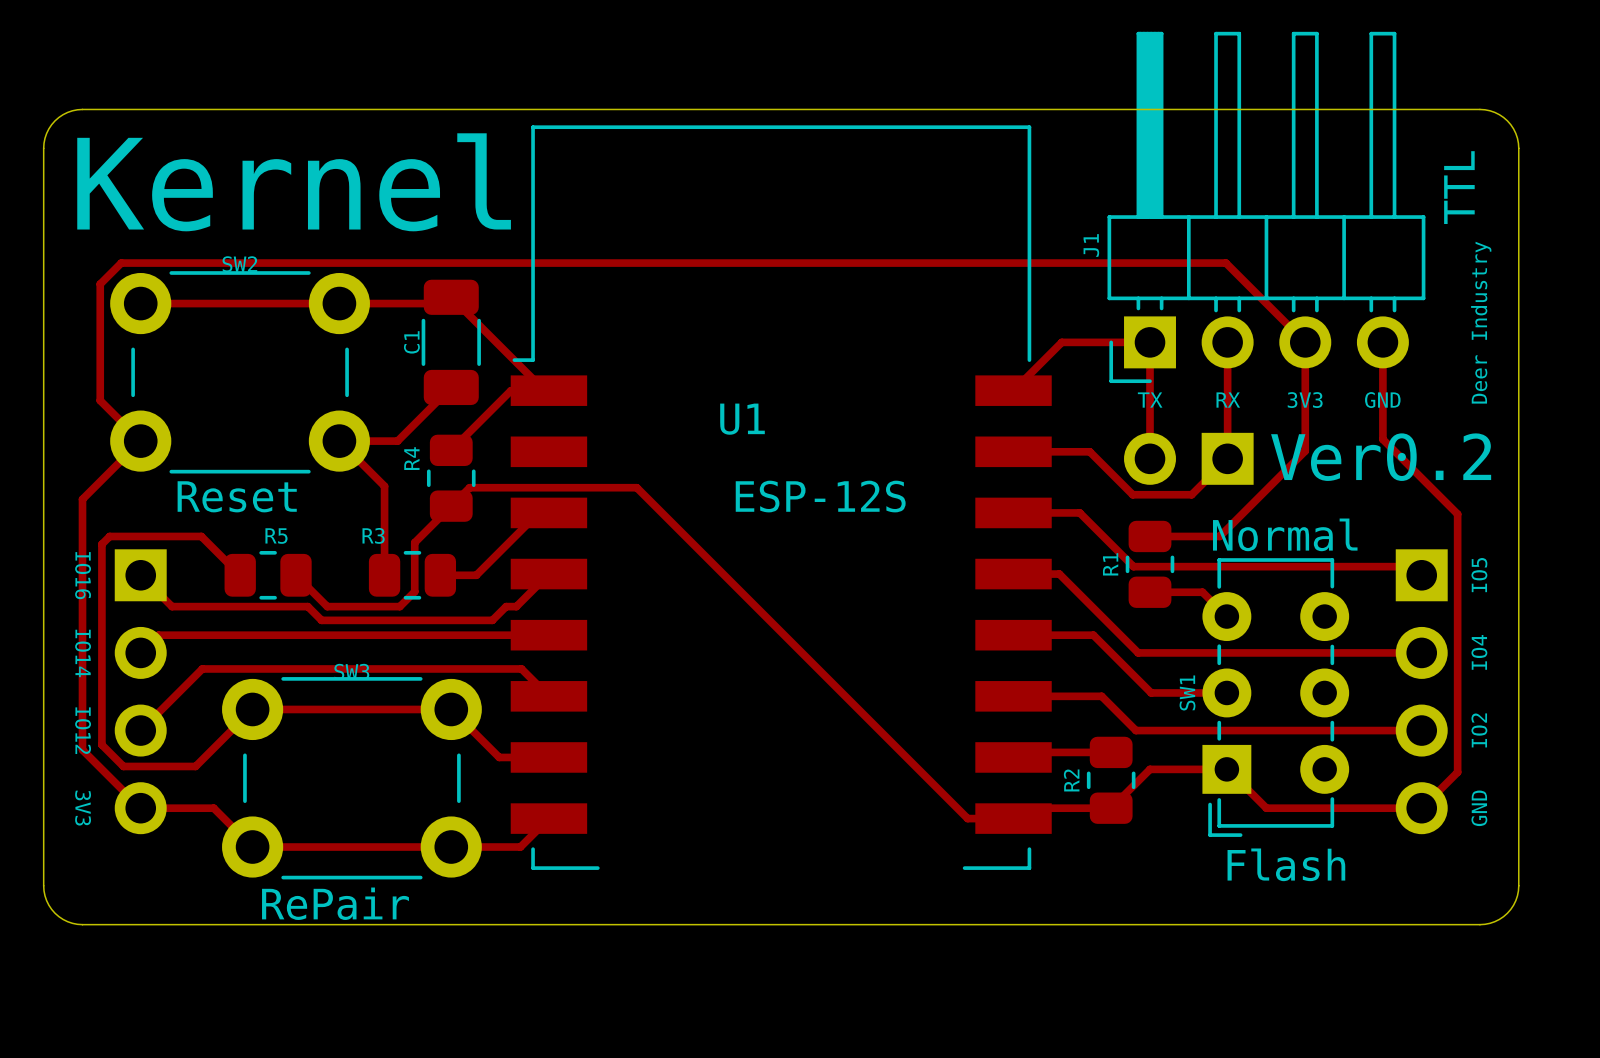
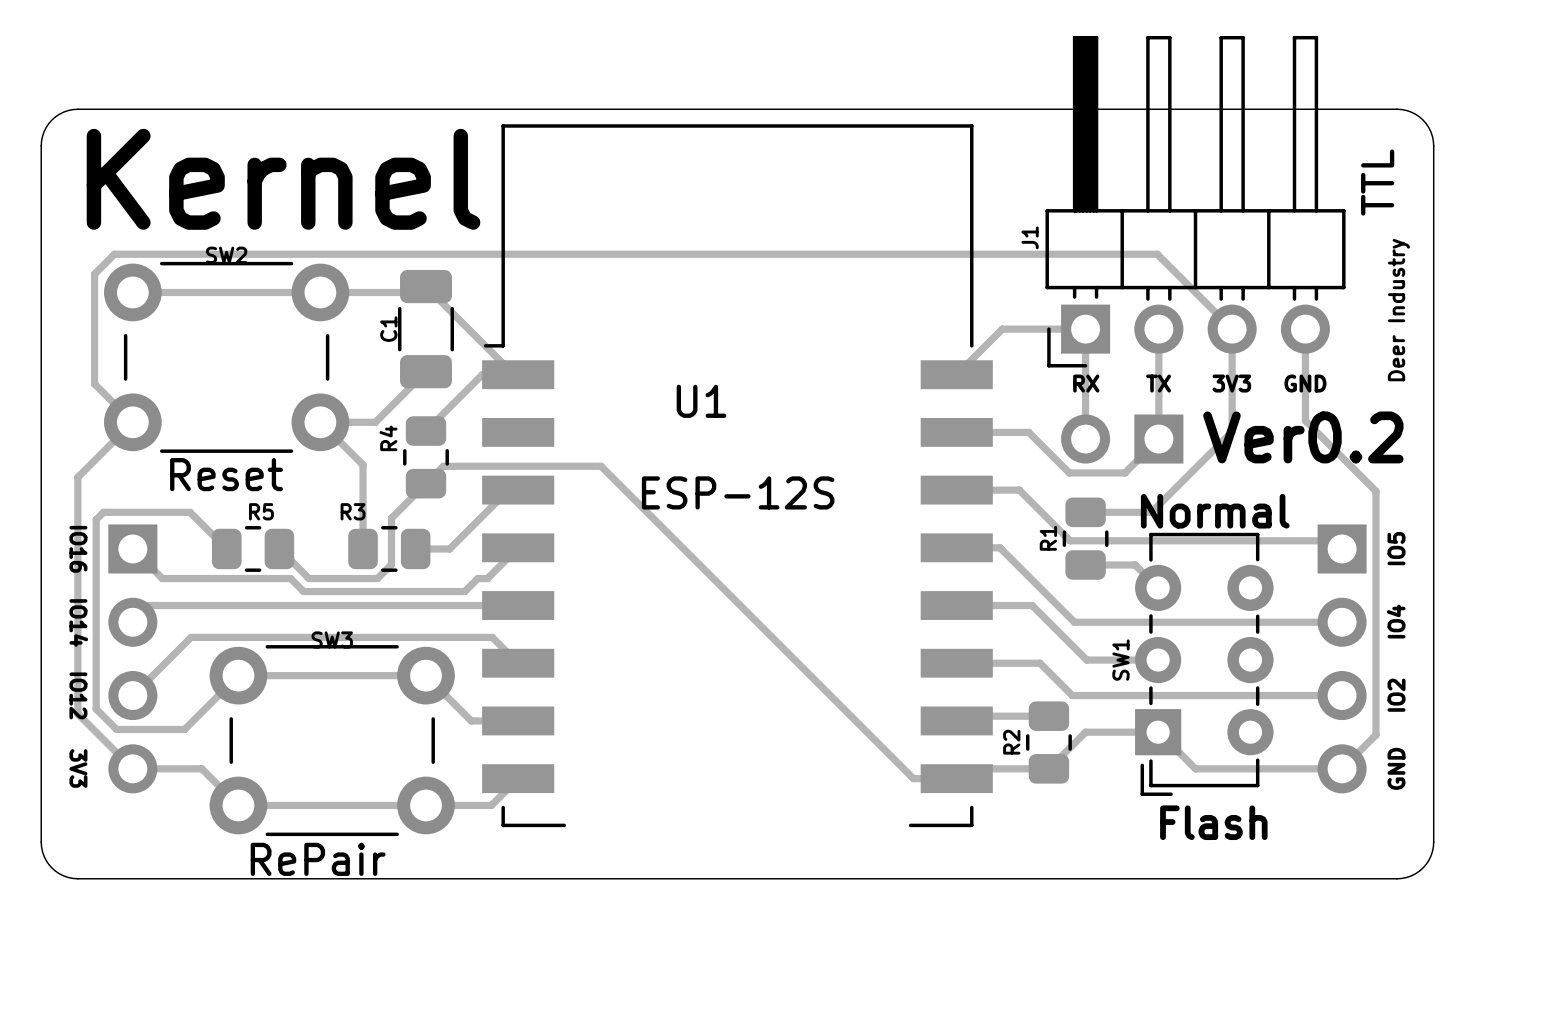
text: TX (1150, 400) -> RX (1086, 383)
text: RX (1228, 400) -> TX (1158, 383)
U1 value position: ESP-12S (820, 496) -> ESP-12S (738, 492)

